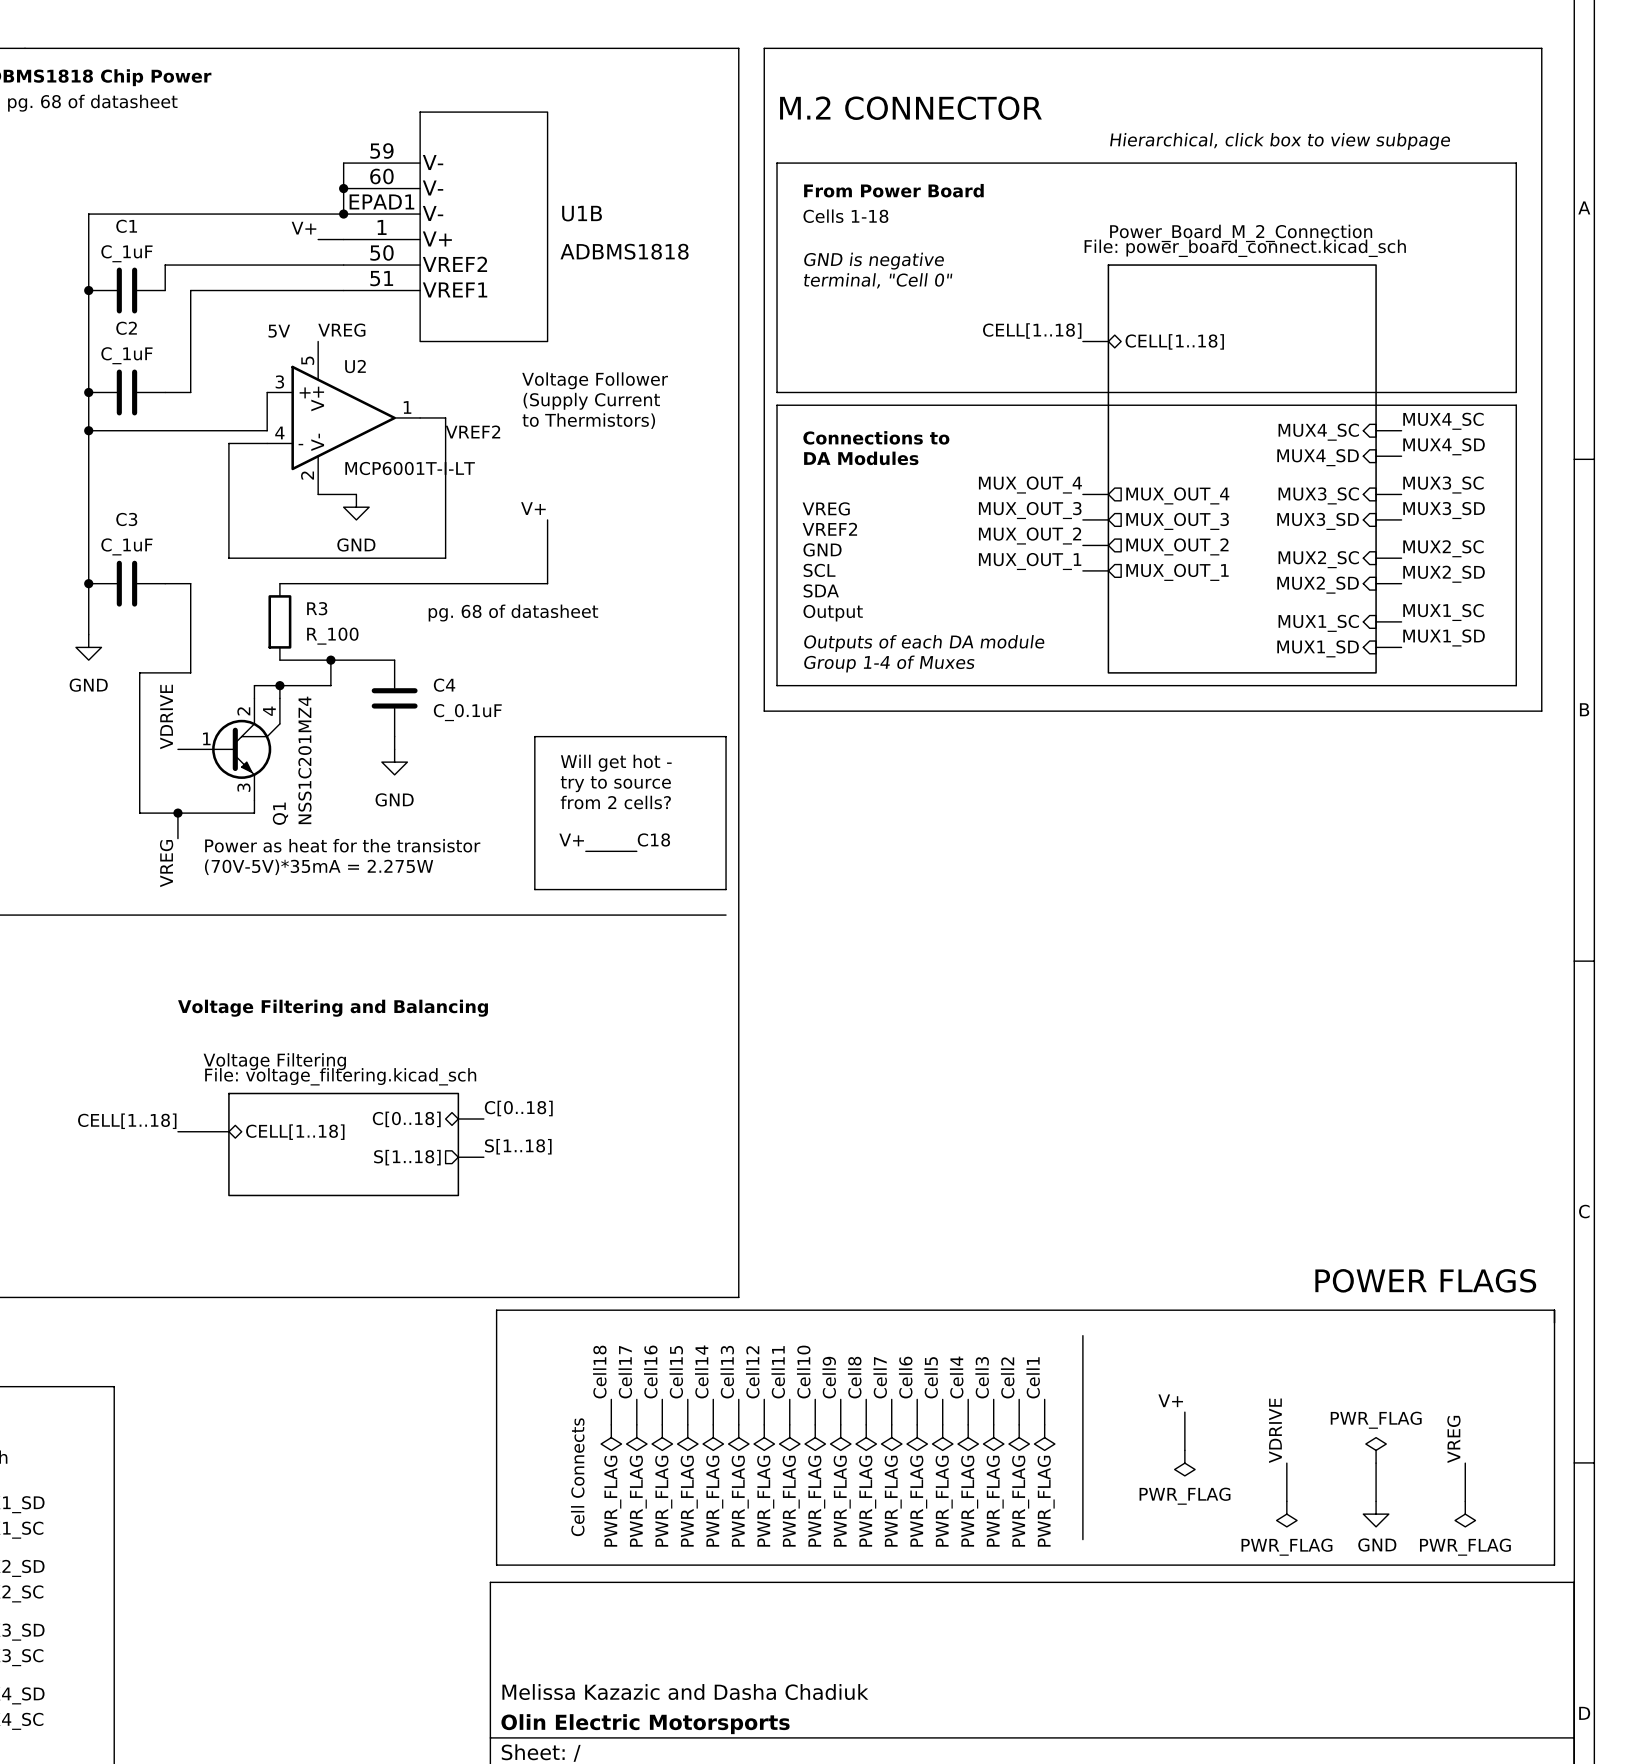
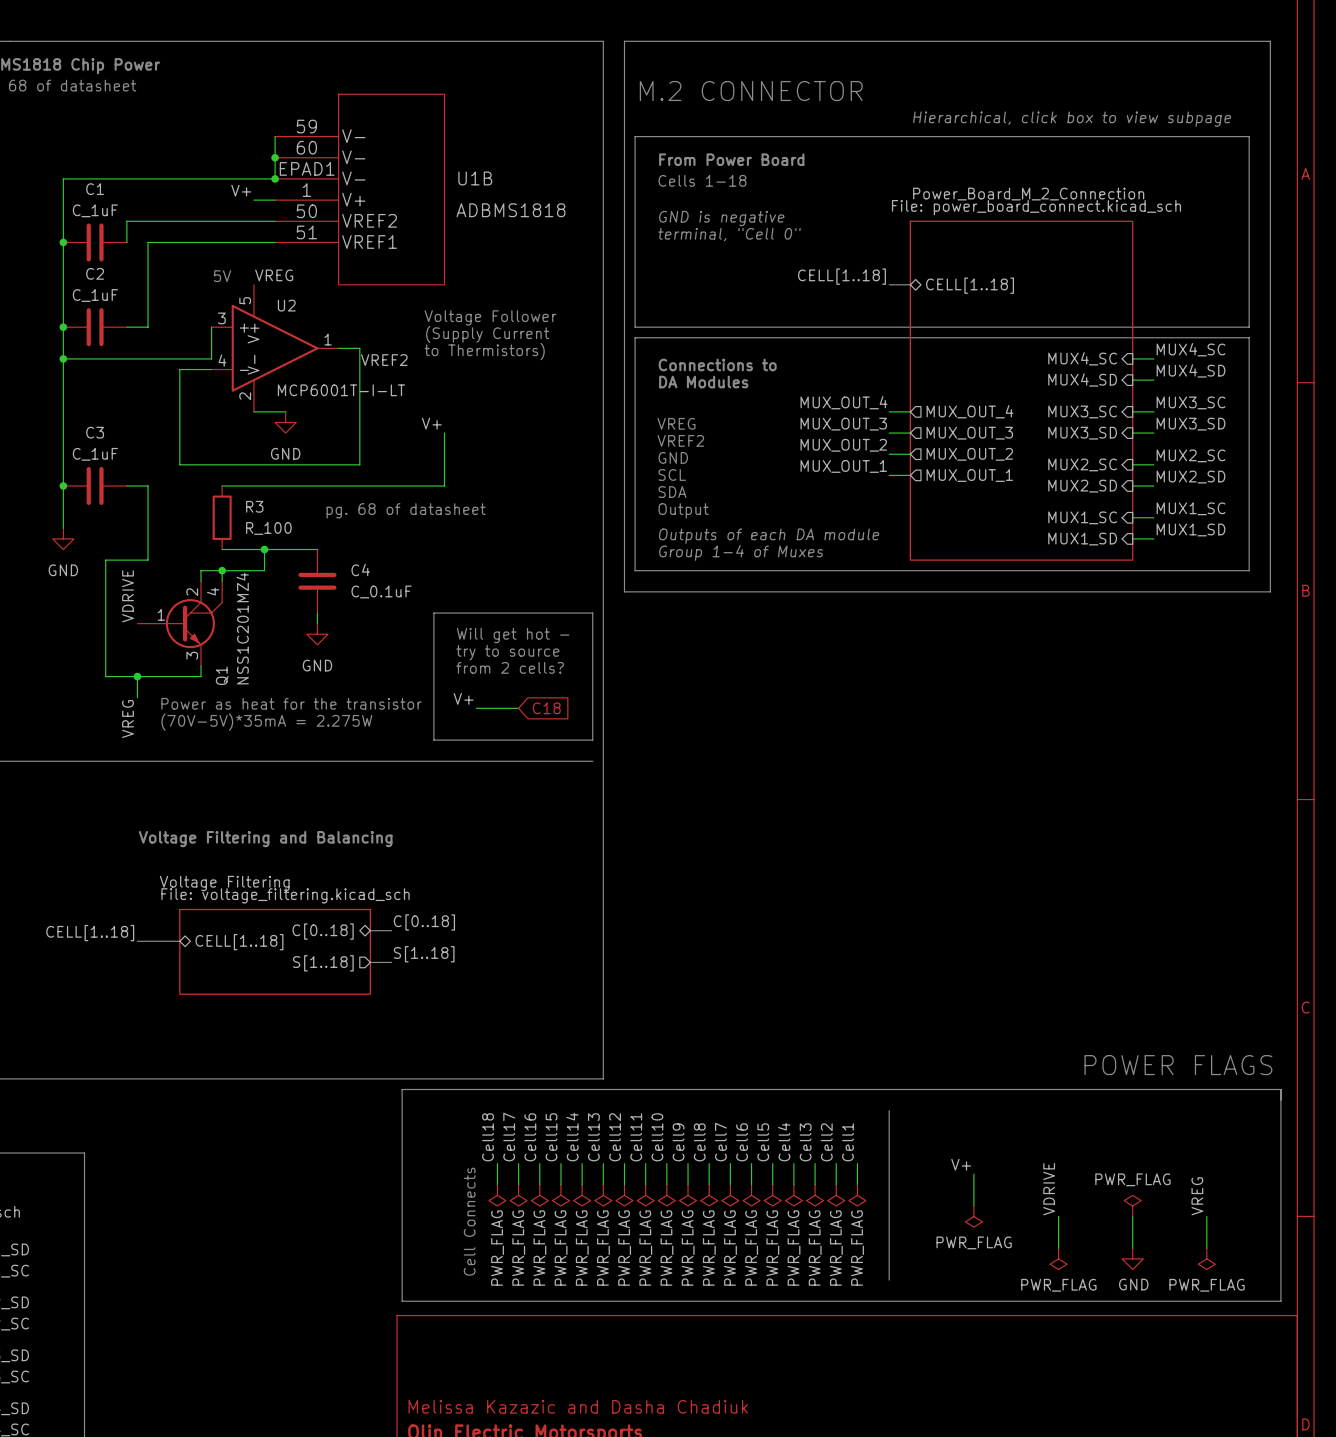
label: C18 (653, 839) -> none
global label: none -> C18 (546, 708)

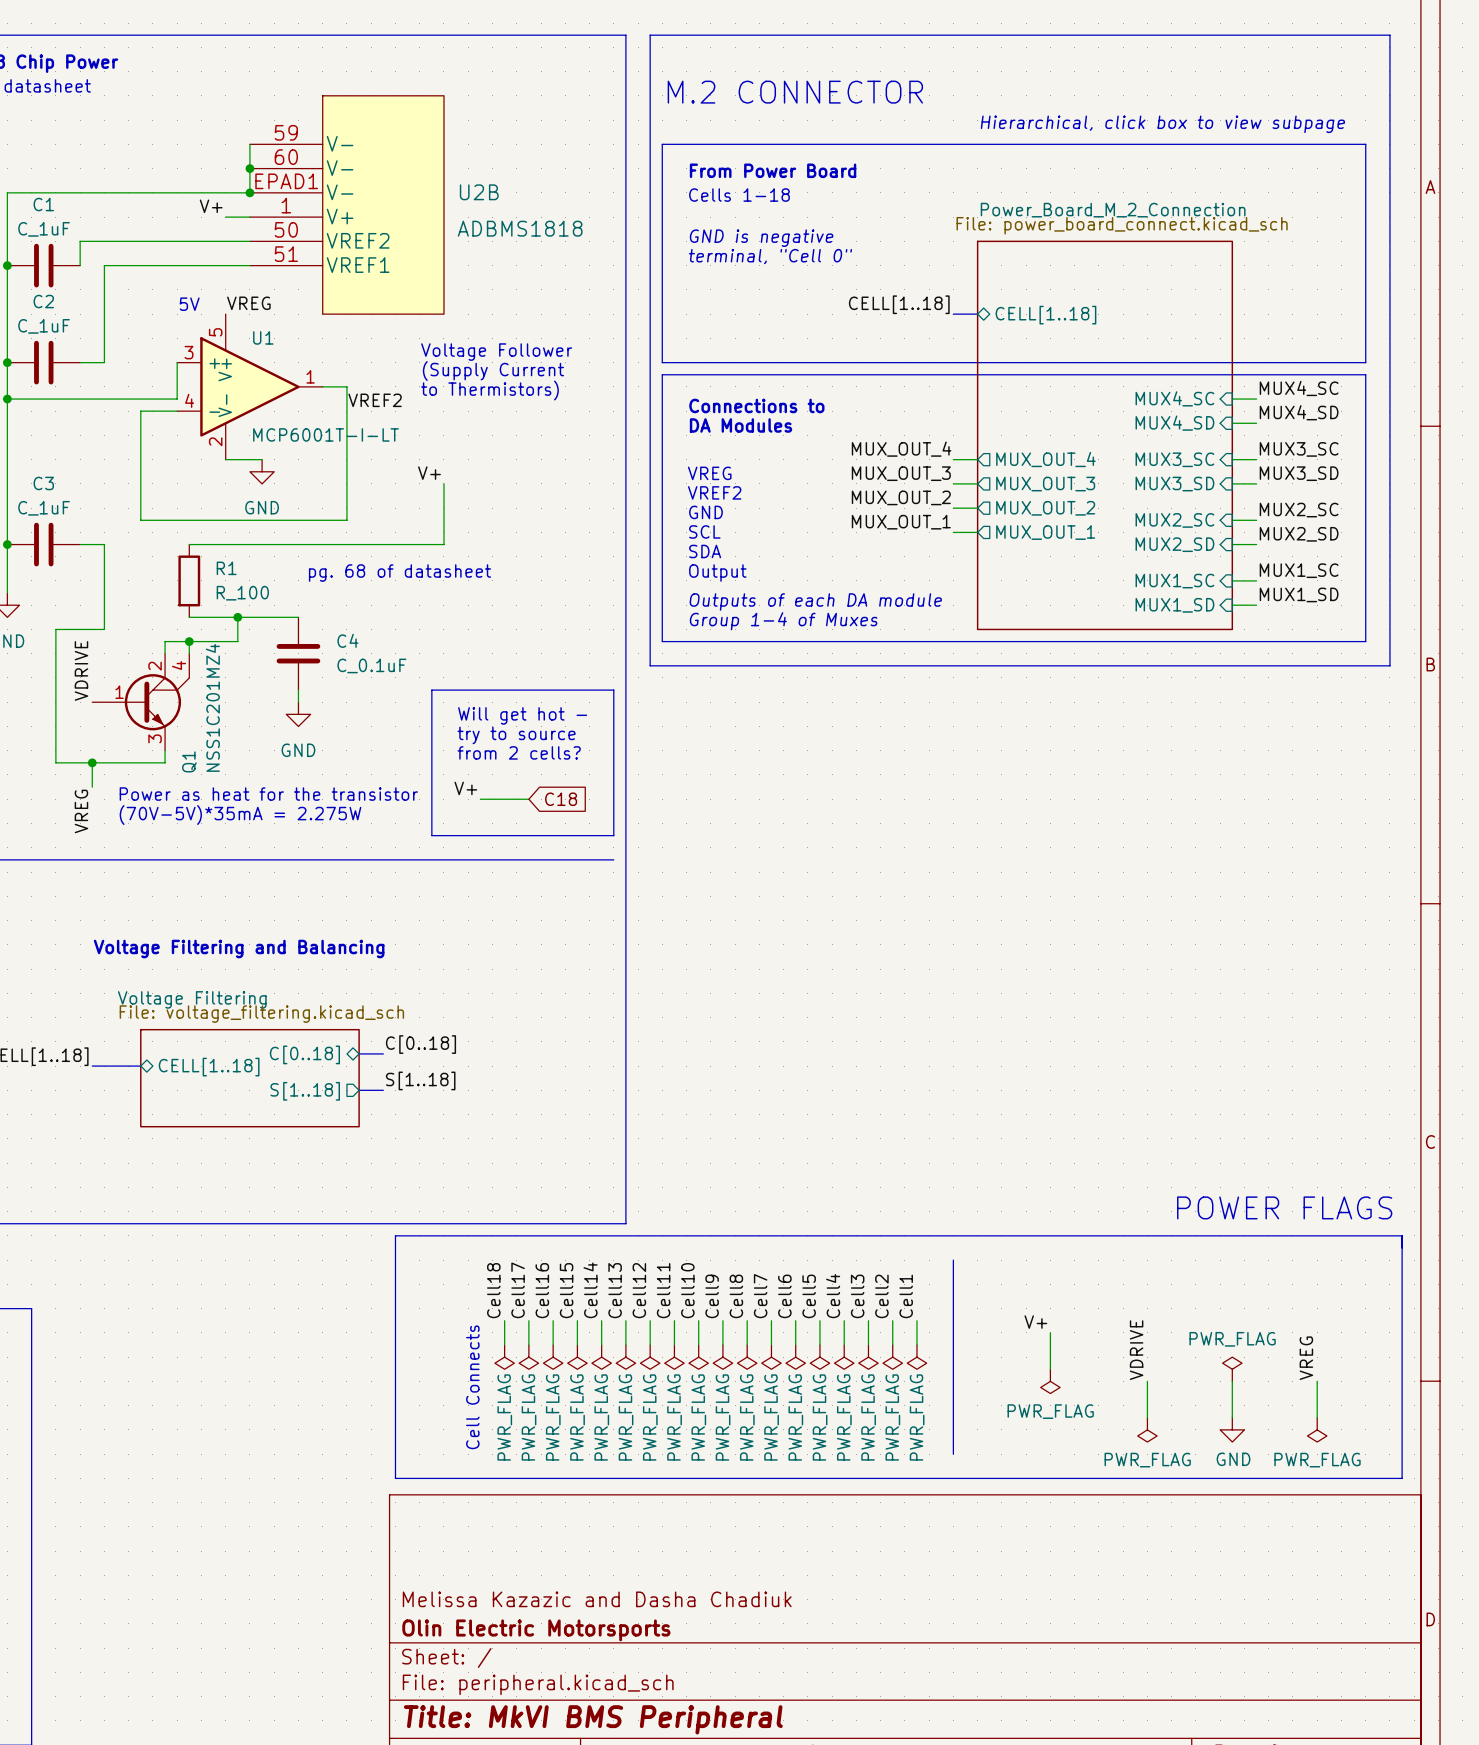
U1B name: U1B (475, 178) -> U2B (479, 192)
U2 name: U2 (286, 305) -> U1 (263, 337)
R3 name: R3 (254, 506) -> R1 (226, 568)

